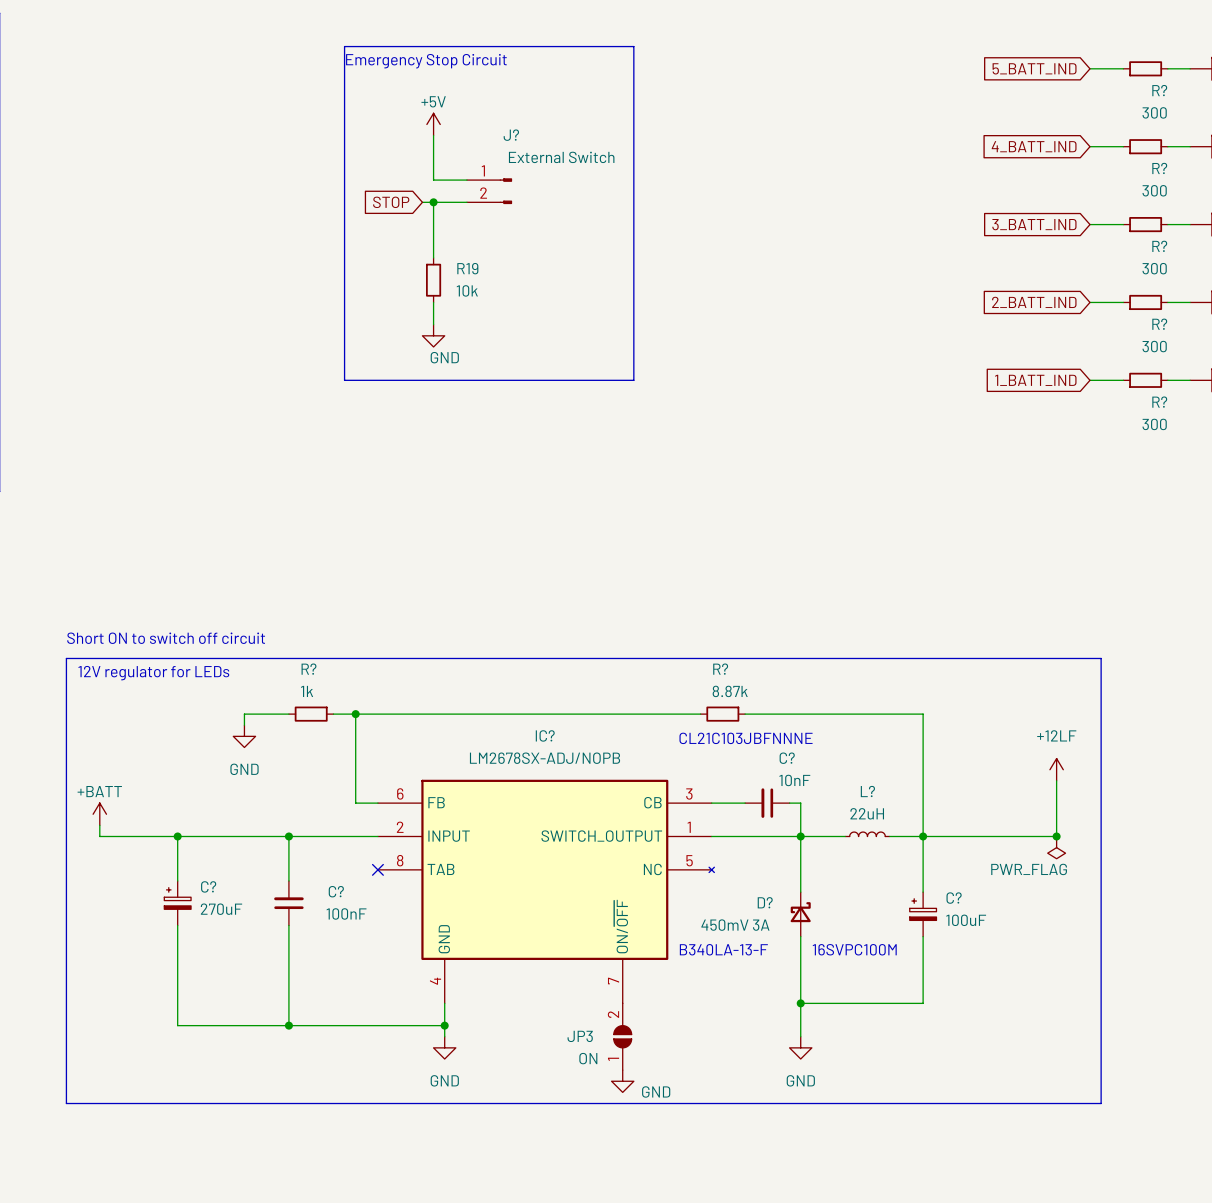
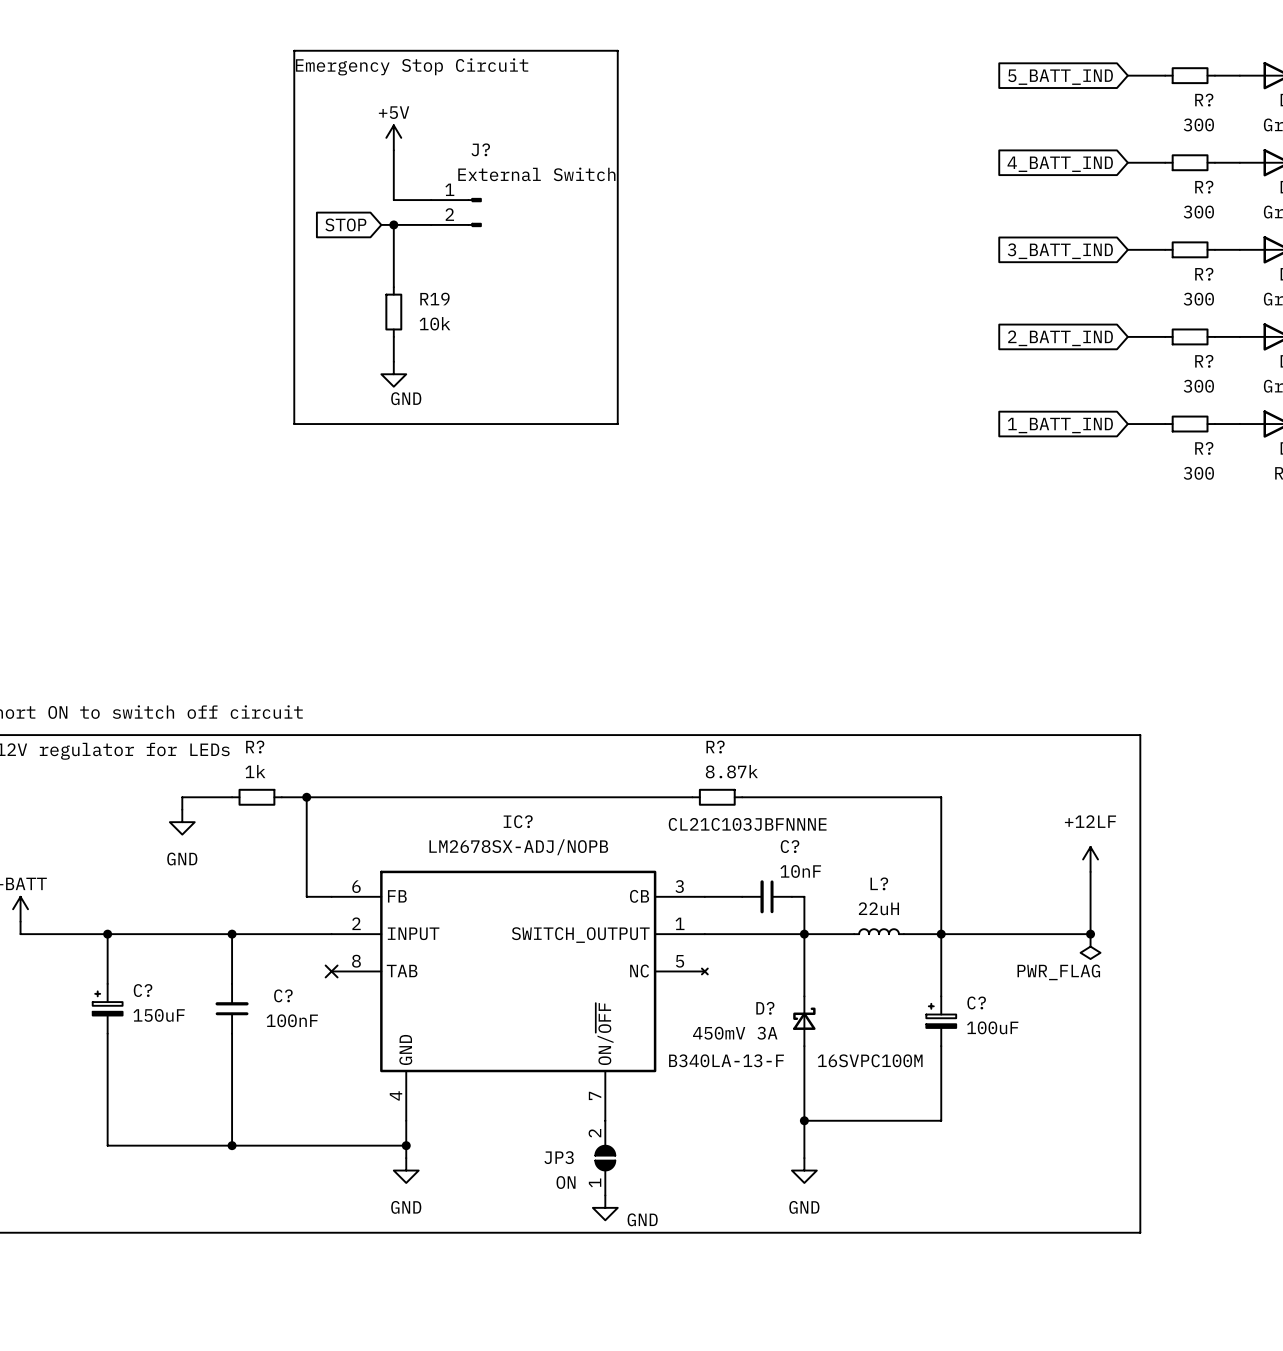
C? value: 270uF (221, 909) -> 150uF (159, 1015)

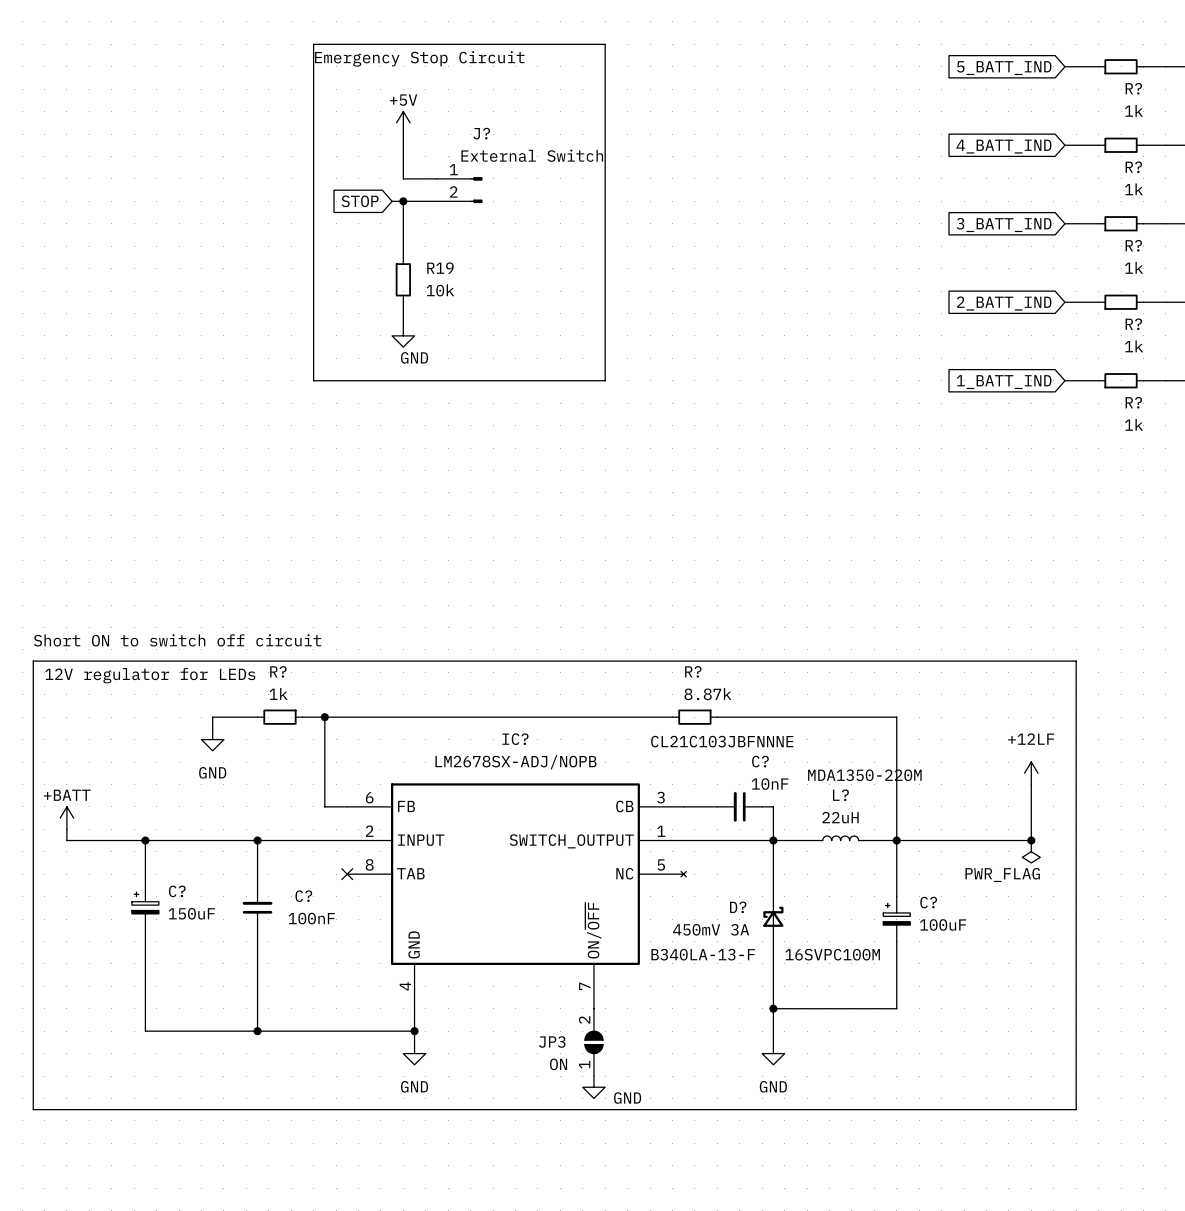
R? value: 300 (1198, 124) -> 1k (1134, 110)
R? value: 300 (1198, 212) -> 1k (1134, 189)
R? value: 300 (1198, 299) -> 1k (1134, 267)
R? value: 300 (1198, 386) -> 1k (1134, 346)
R? value: 300 (1198, 473) -> 1k (1134, 424)
text: none -> MDA1350-220M (864, 775)

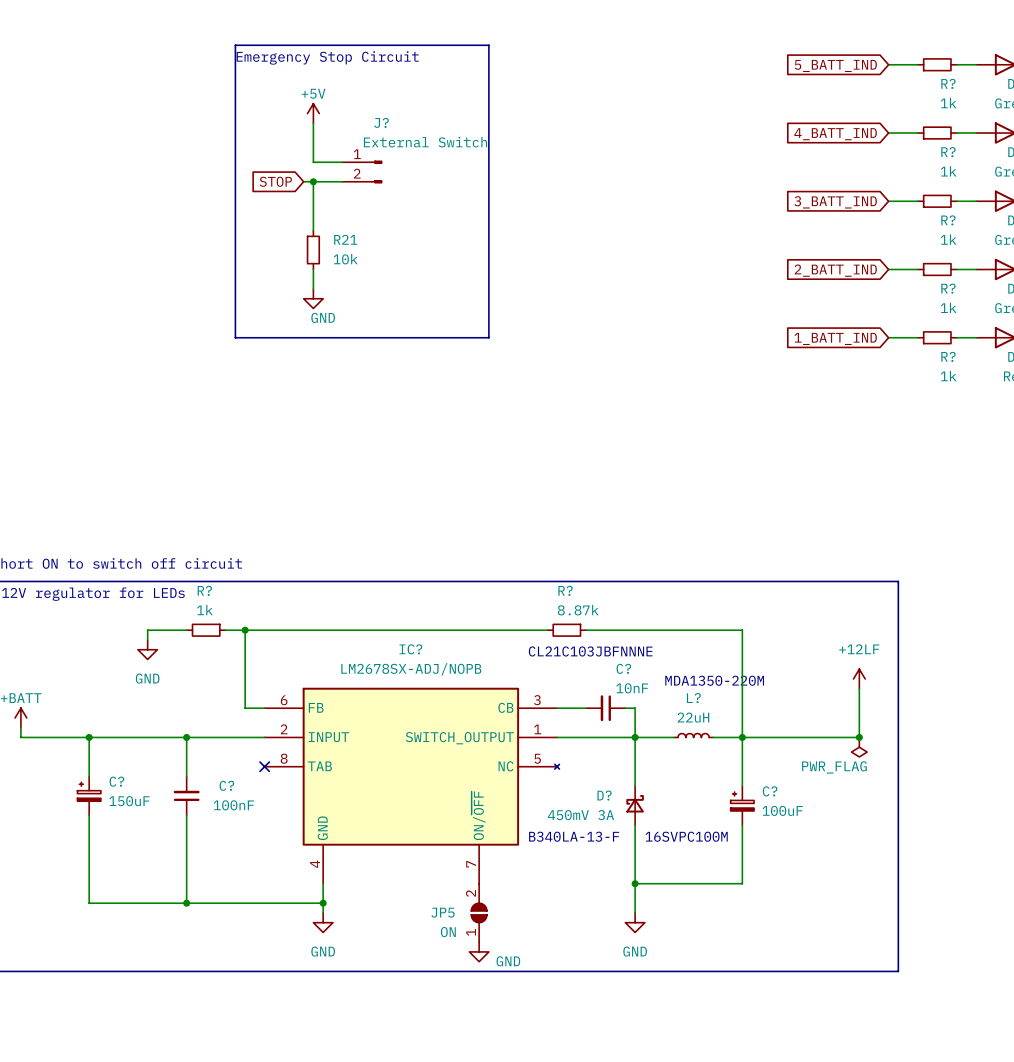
R19 name: R19 (440, 268) -> R21 (345, 239)
JP3 name: JP3 (552, 1041) -> JP5 (443, 912)

